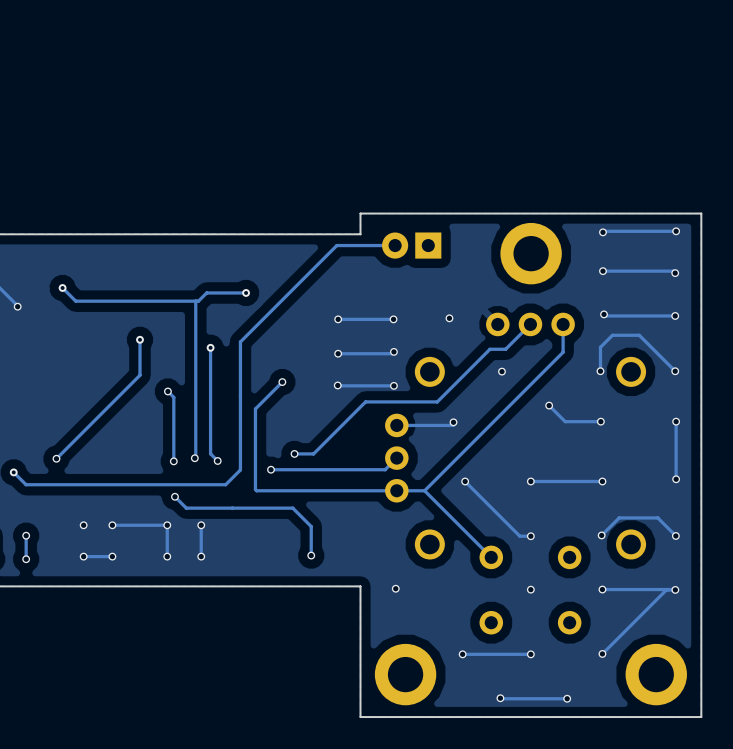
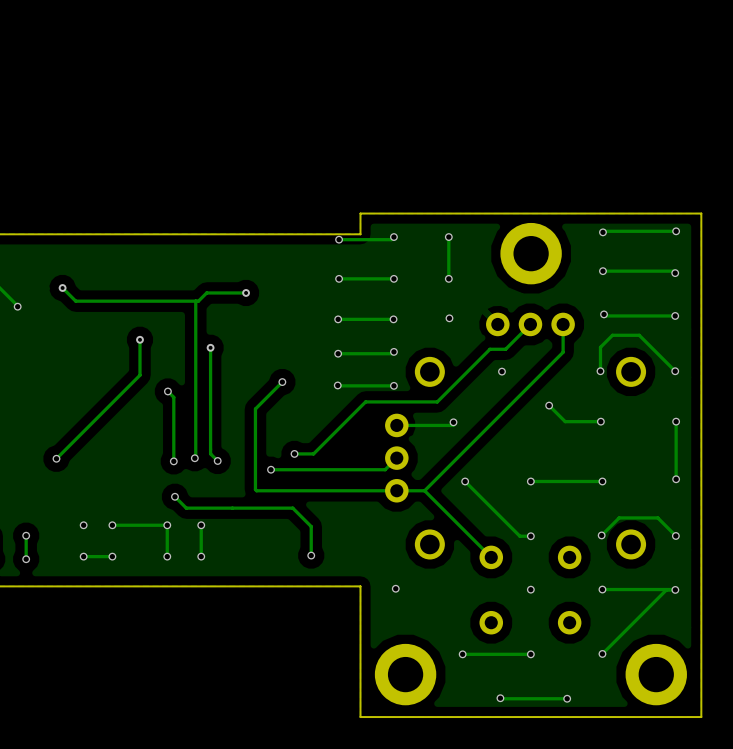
track: none -> (393, 237) (391, 239) (339, 239)
via: none -> (393, 237)
track: none -> (448, 237) (448, 278)
via: none -> (448, 237)
via: none -> (339, 239)
track: (395, 245) (336, 245) (240, 341) (240, 469) (225, 484) (26, 484) (13, 472) -> none
part: (411, 245) -> none
via: none -> (339, 278)
track: none -> (393, 278) (339, 278)
via: none -> (393, 278)
via: none -> (448, 278)
via: (13, 472) -> none

